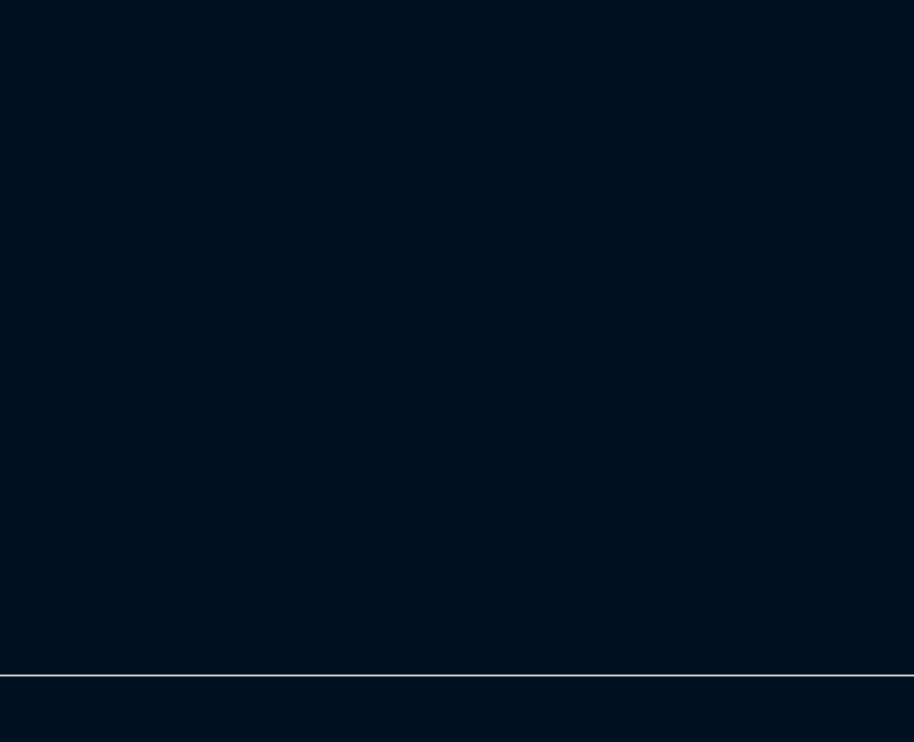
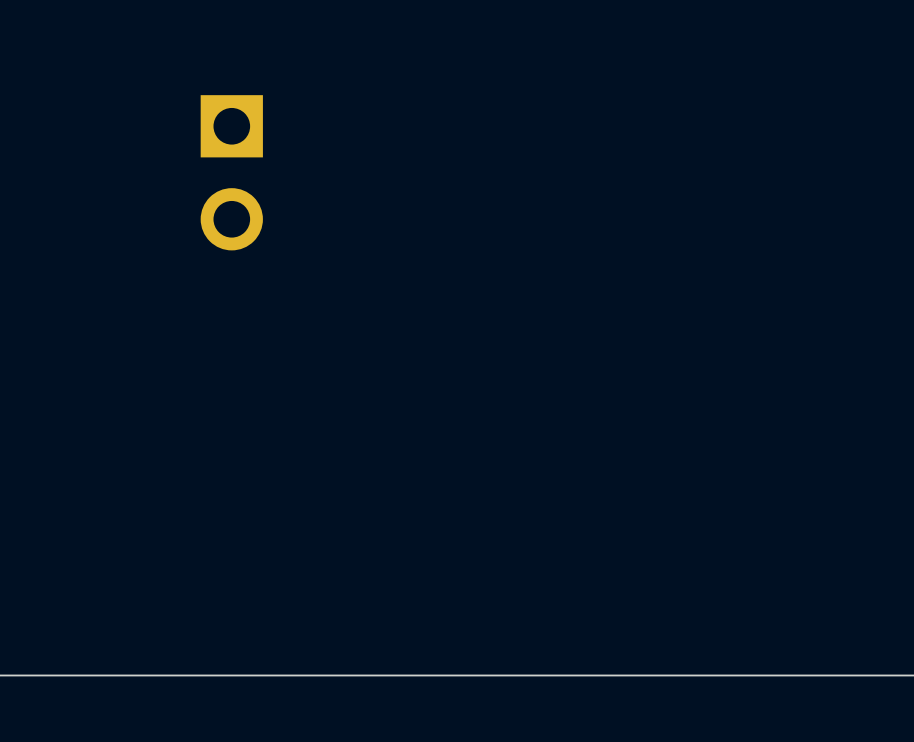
part: none -> (231, 172)

